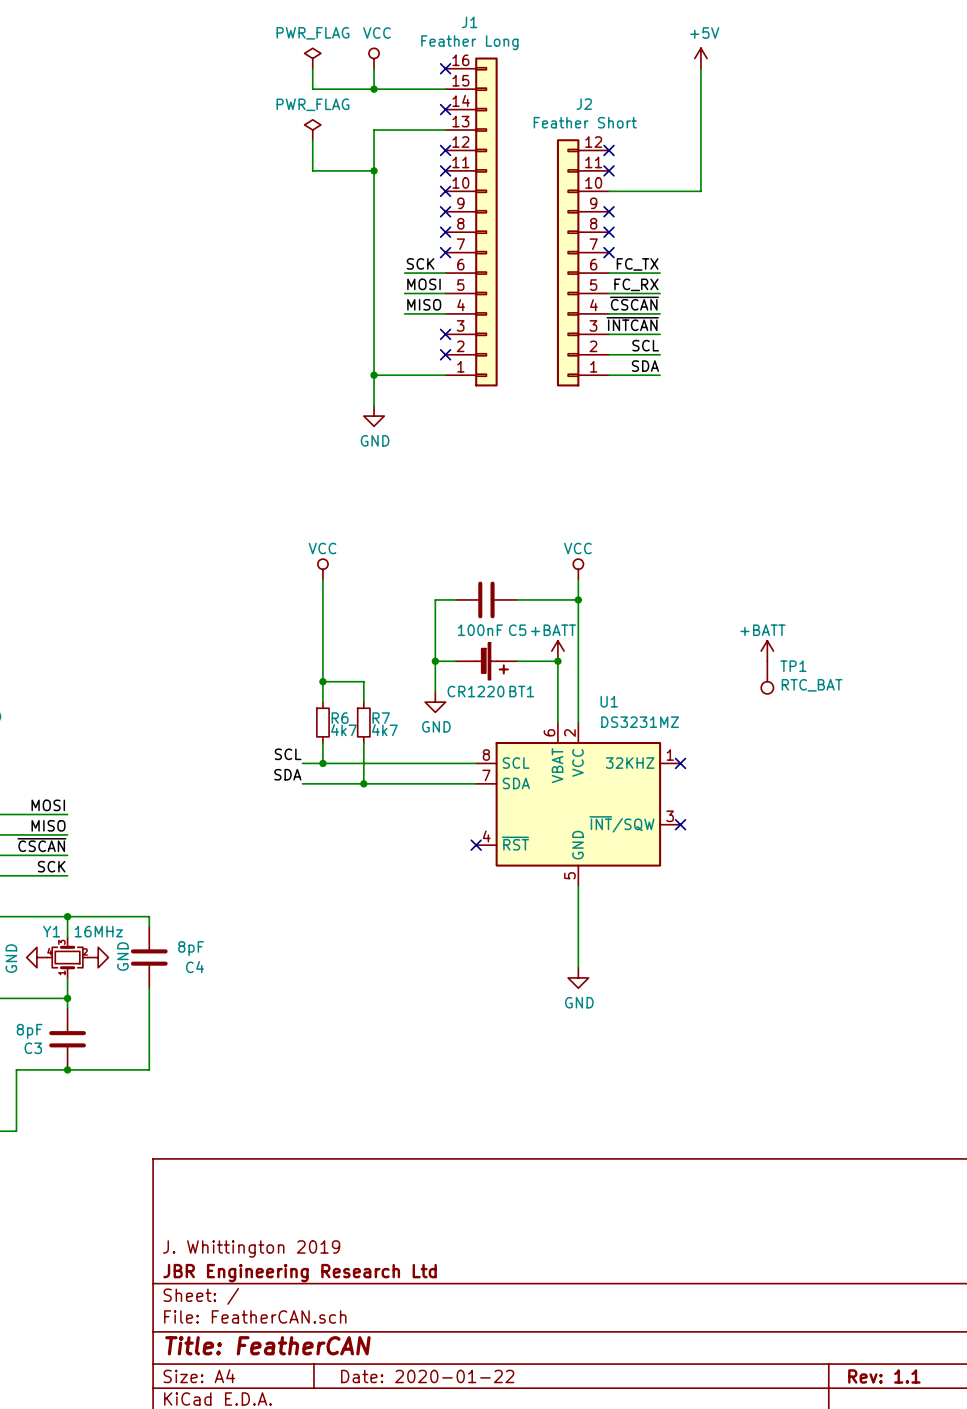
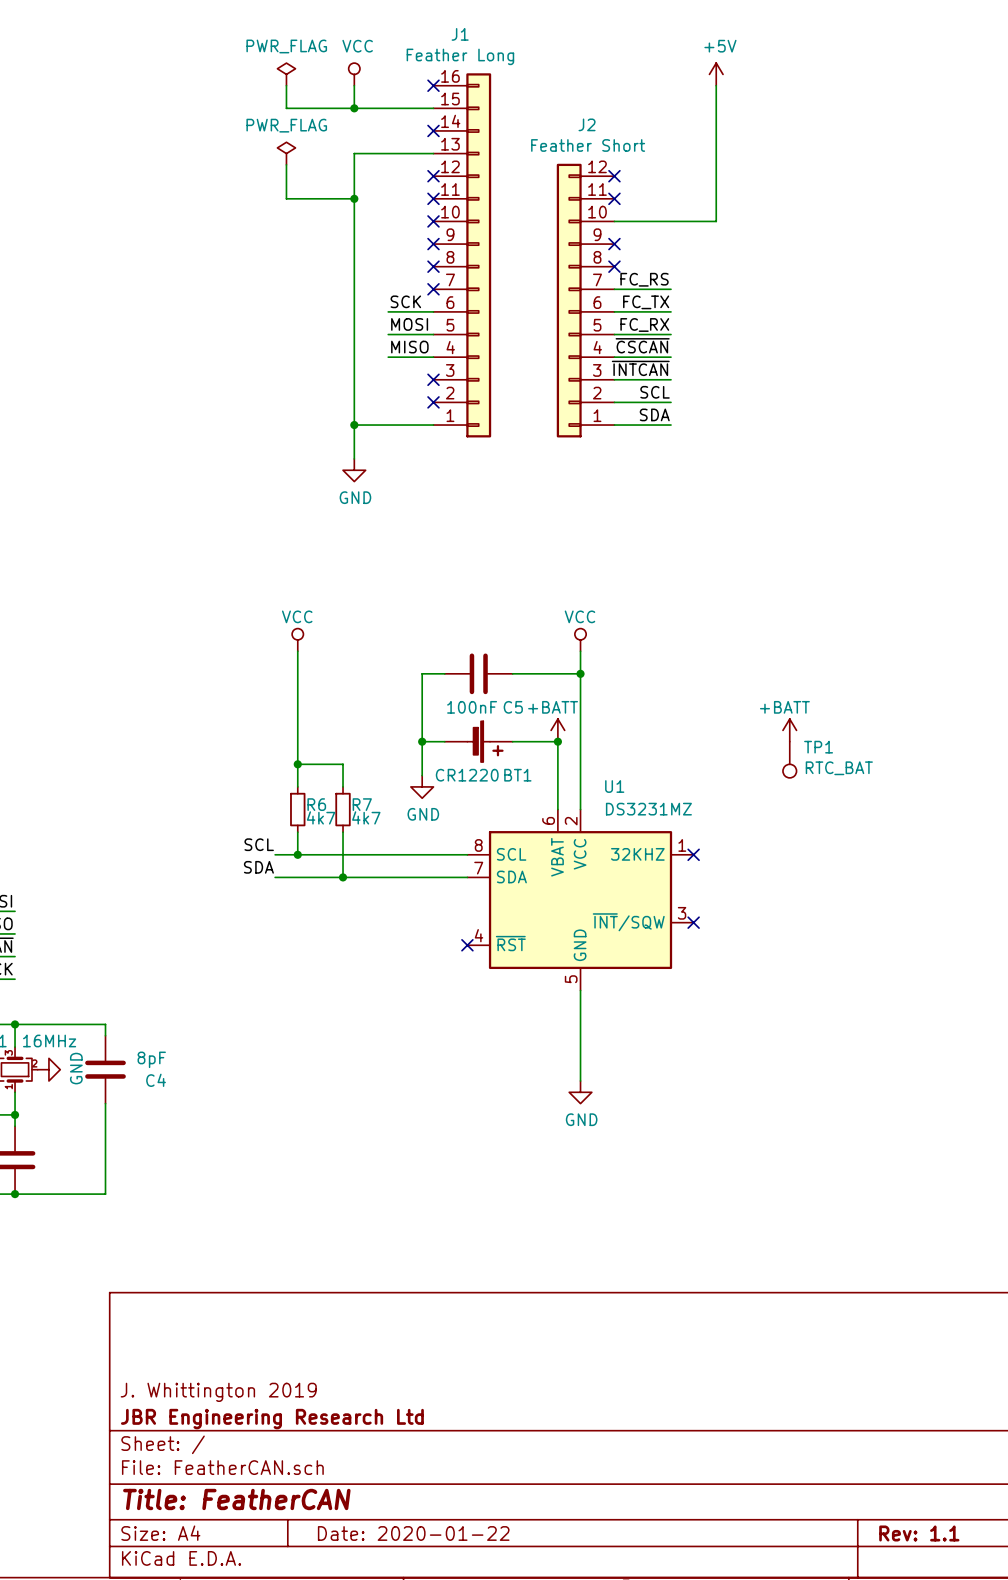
label: none -> FC_RS (644, 279)
wire: none -> (614, 289) (671, 289)
no-connect mark: (609, 252) -> none

